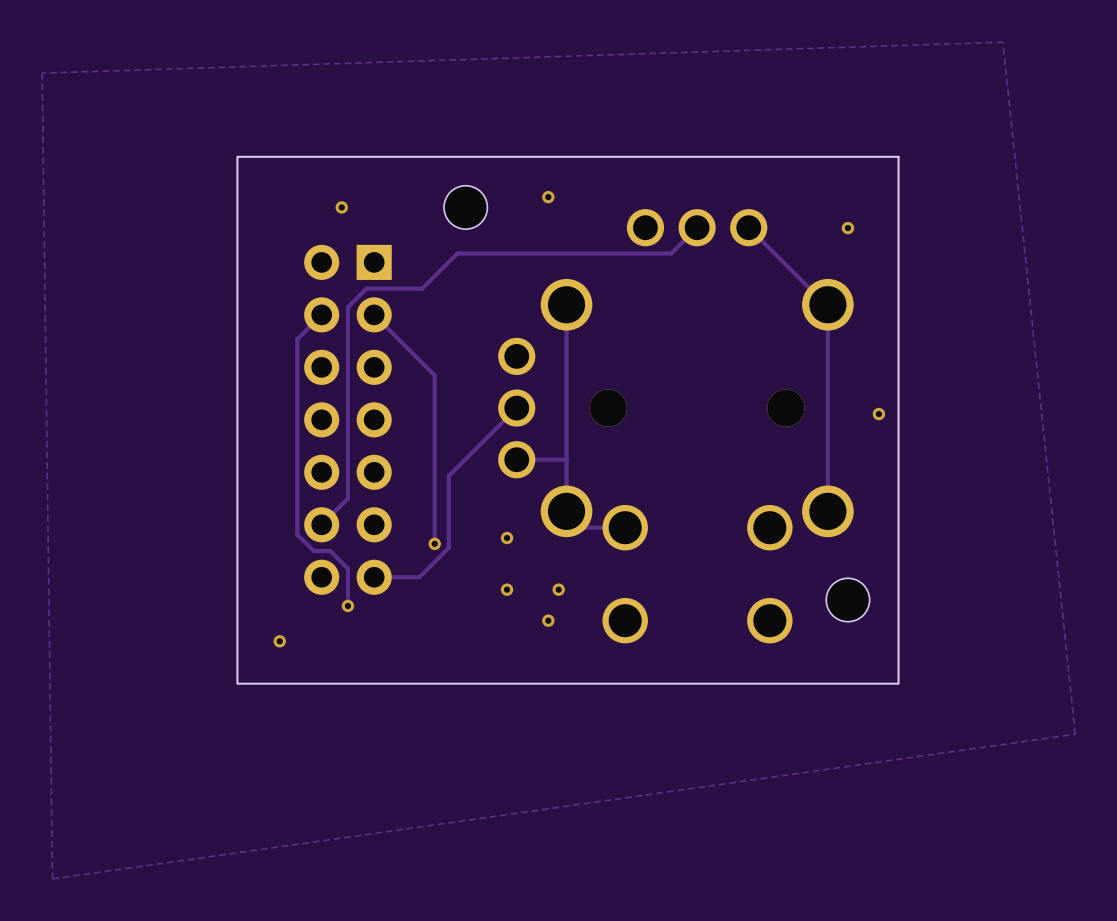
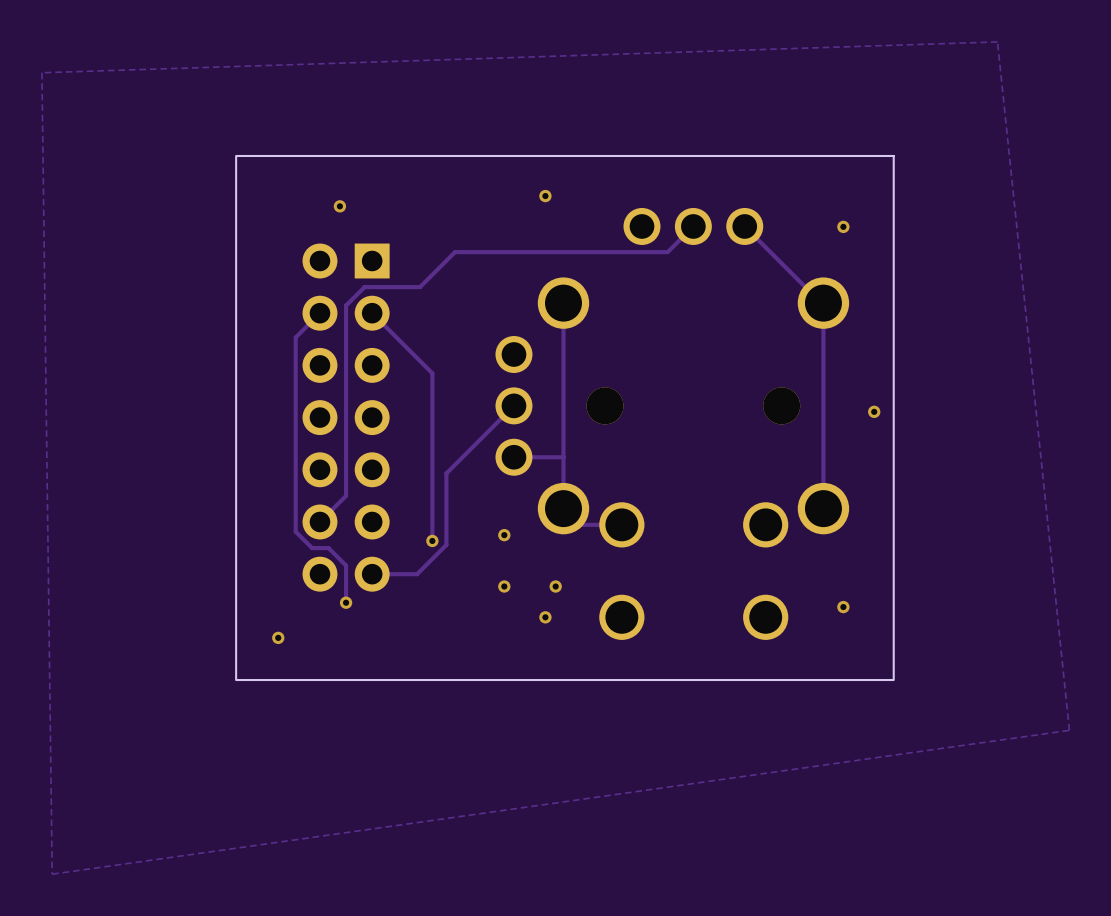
part: (465, 207) -> none
part: (847, 600) -> none
via: none -> (843, 607)

